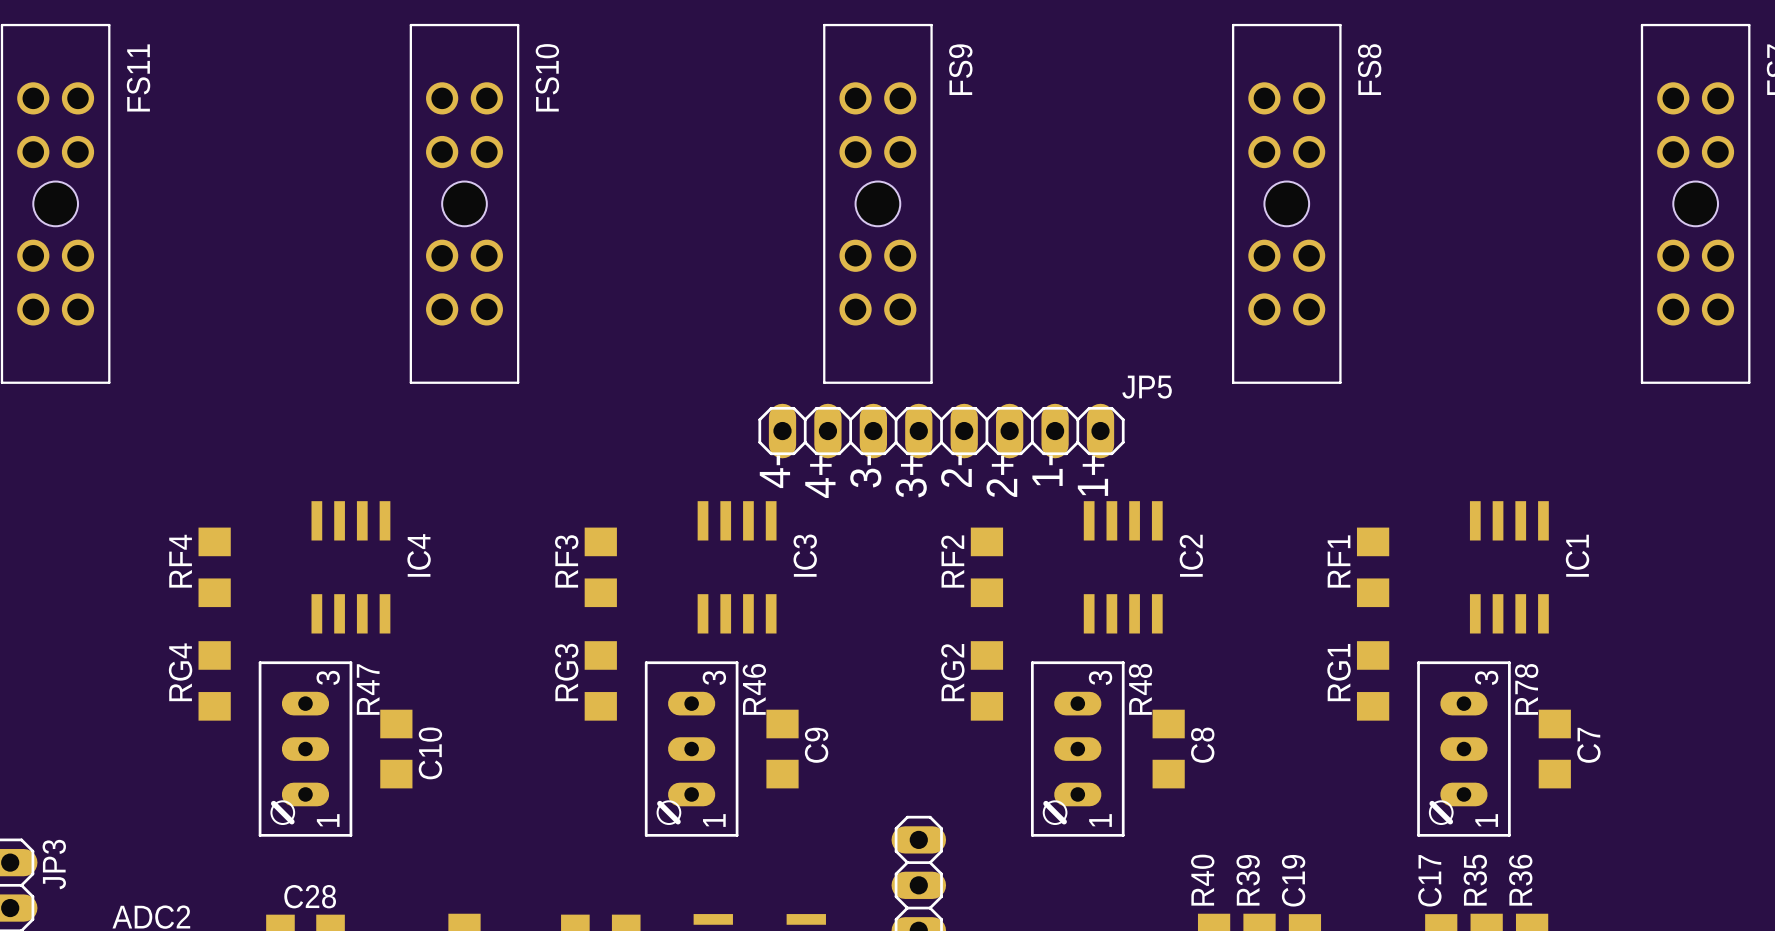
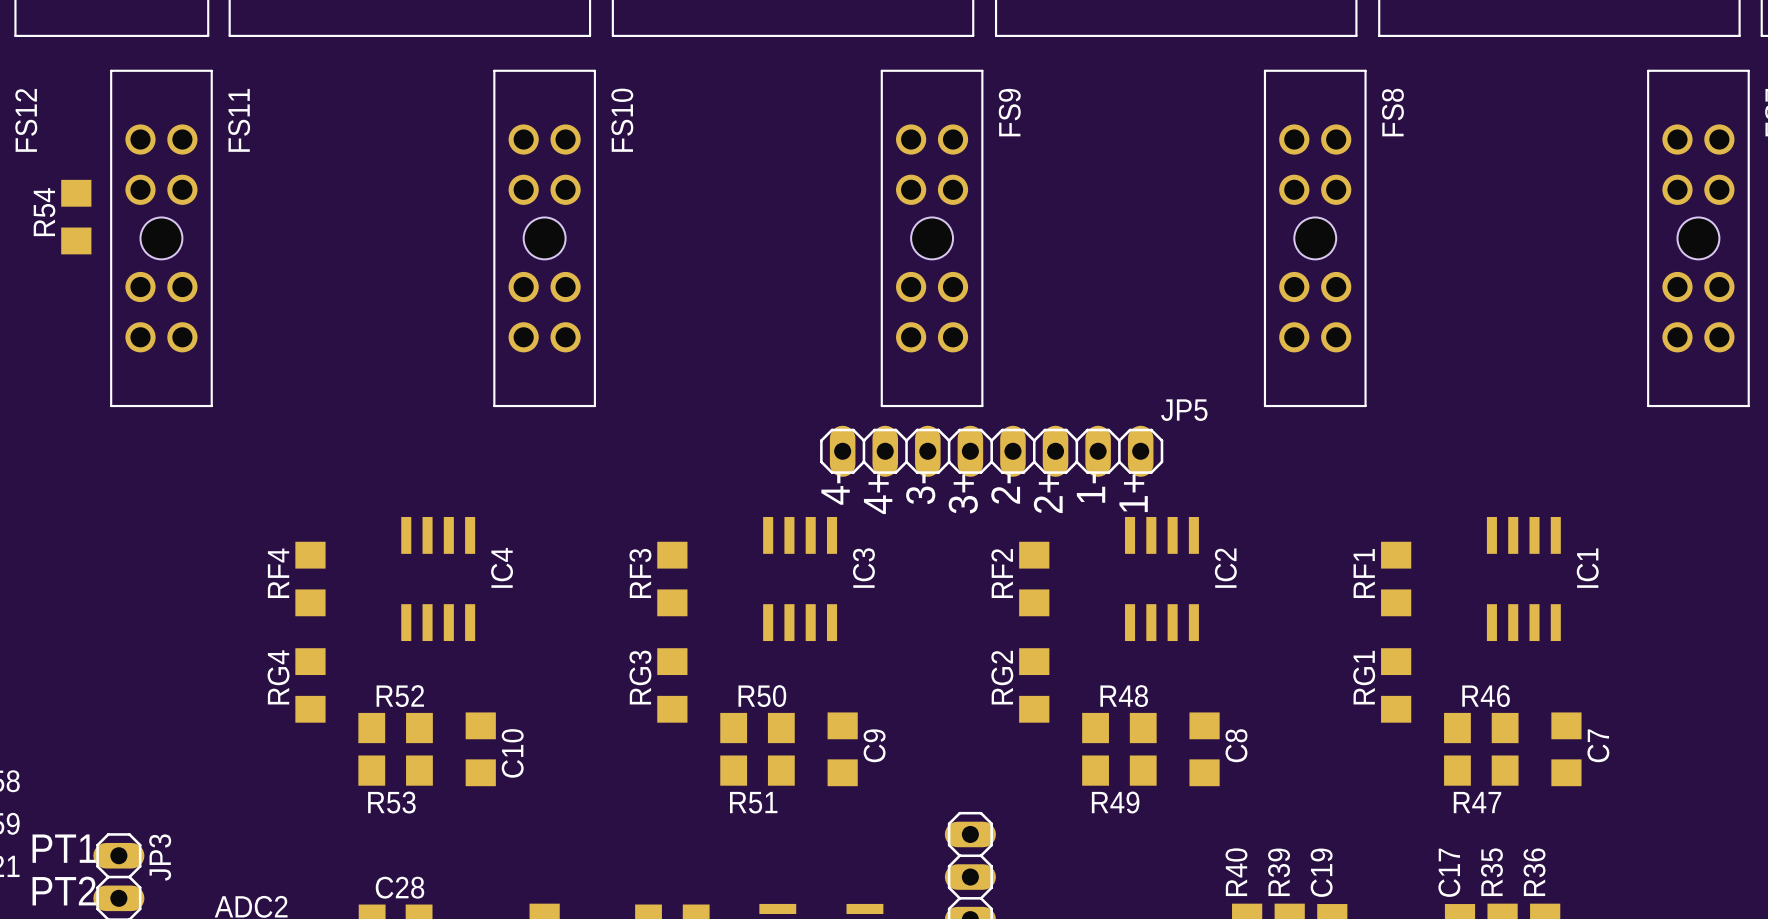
R47 footprint: [258, 661, 353, 837] -> [1444, 755, 1519, 786]
R46 footprint: [644, 661, 739, 837] -> [1444, 712, 1519, 744]
R48 footprint: [1031, 661, 1125, 837] -> [1082, 712, 1157, 744]
R47 name position: R47 (368, 689) -> R47 (1477, 802)
R46 name position: R46 (754, 689) -> R46 (1486, 696)
R48 name position: R48 (1140, 689) -> R48 (1124, 696)
R52: none -> (395, 728)
R50: none -> (757, 728)
R78: (1463, 749) -> none
R53: none -> (395, 770)
R51: none -> (757, 770)
R49: none -> (1119, 770)

